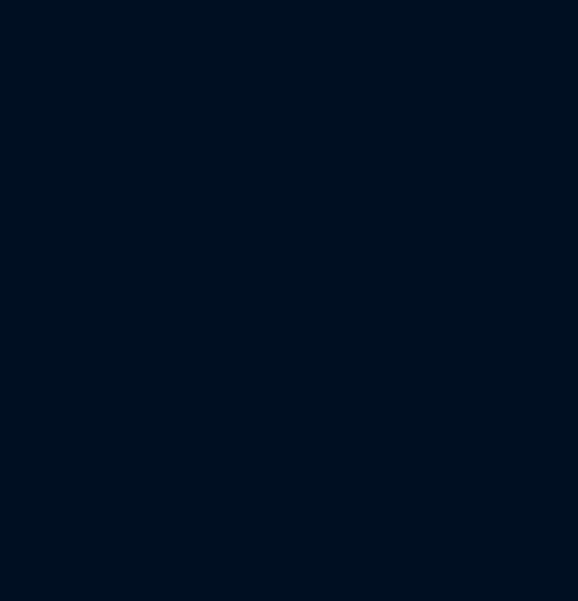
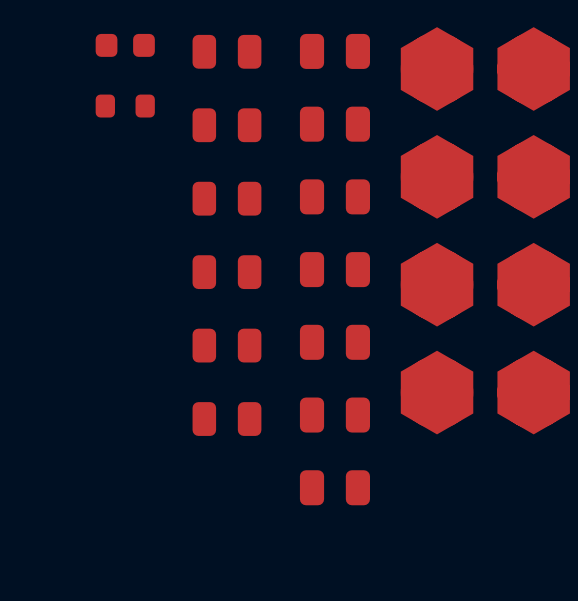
part: none -> (125, 45)
part: none -> (226, 51)
part: none -> (334, 51)
part: none -> (437, 69)
part: none -> (533, 69)
part: none -> (125, 106)
part: none -> (334, 124)
part: none -> (226, 125)
part: none -> (437, 176)
part: none -> (533, 176)
part: none -> (334, 196)
part: none -> (226, 198)
part: none -> (334, 269)
part: none -> (226, 272)
part: none -> (437, 284)
part: none -> (533, 284)
part: none -> (334, 342)
part: none -> (226, 345)
part: none -> (437, 392)
part: none -> (533, 392)
part: none -> (334, 415)
part: none -> (226, 419)
part: none -> (334, 487)

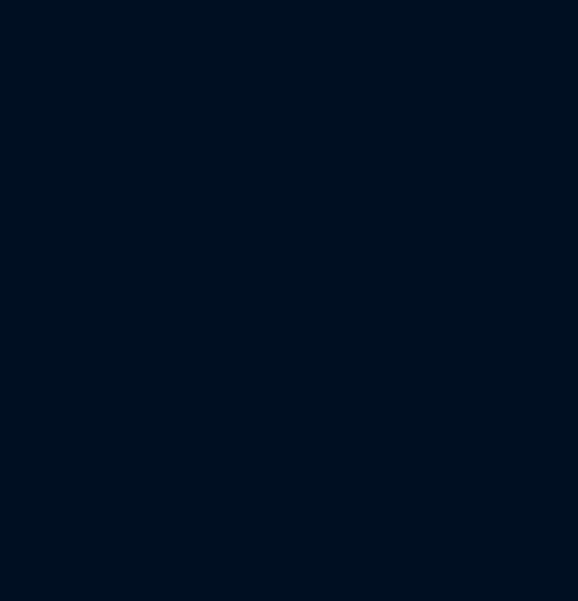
part: (125, 45) -> none
part: (226, 51) -> none
part: (334, 51) -> none
part: (437, 69) -> none
part: (533, 69) -> none
part: (125, 106) -> none
part: (334, 124) -> none
part: (226, 125) -> none
part: (437, 176) -> none
part: (533, 176) -> none
part: (334, 196) -> none
part: (226, 198) -> none
part: (334, 269) -> none
part: (226, 272) -> none
part: (437, 284) -> none
part: (533, 284) -> none
part: (334, 342) -> none
part: (226, 345) -> none
part: (437, 392) -> none
part: (533, 392) -> none
part: (334, 415) -> none
part: (226, 419) -> none
part: (334, 487) -> none

